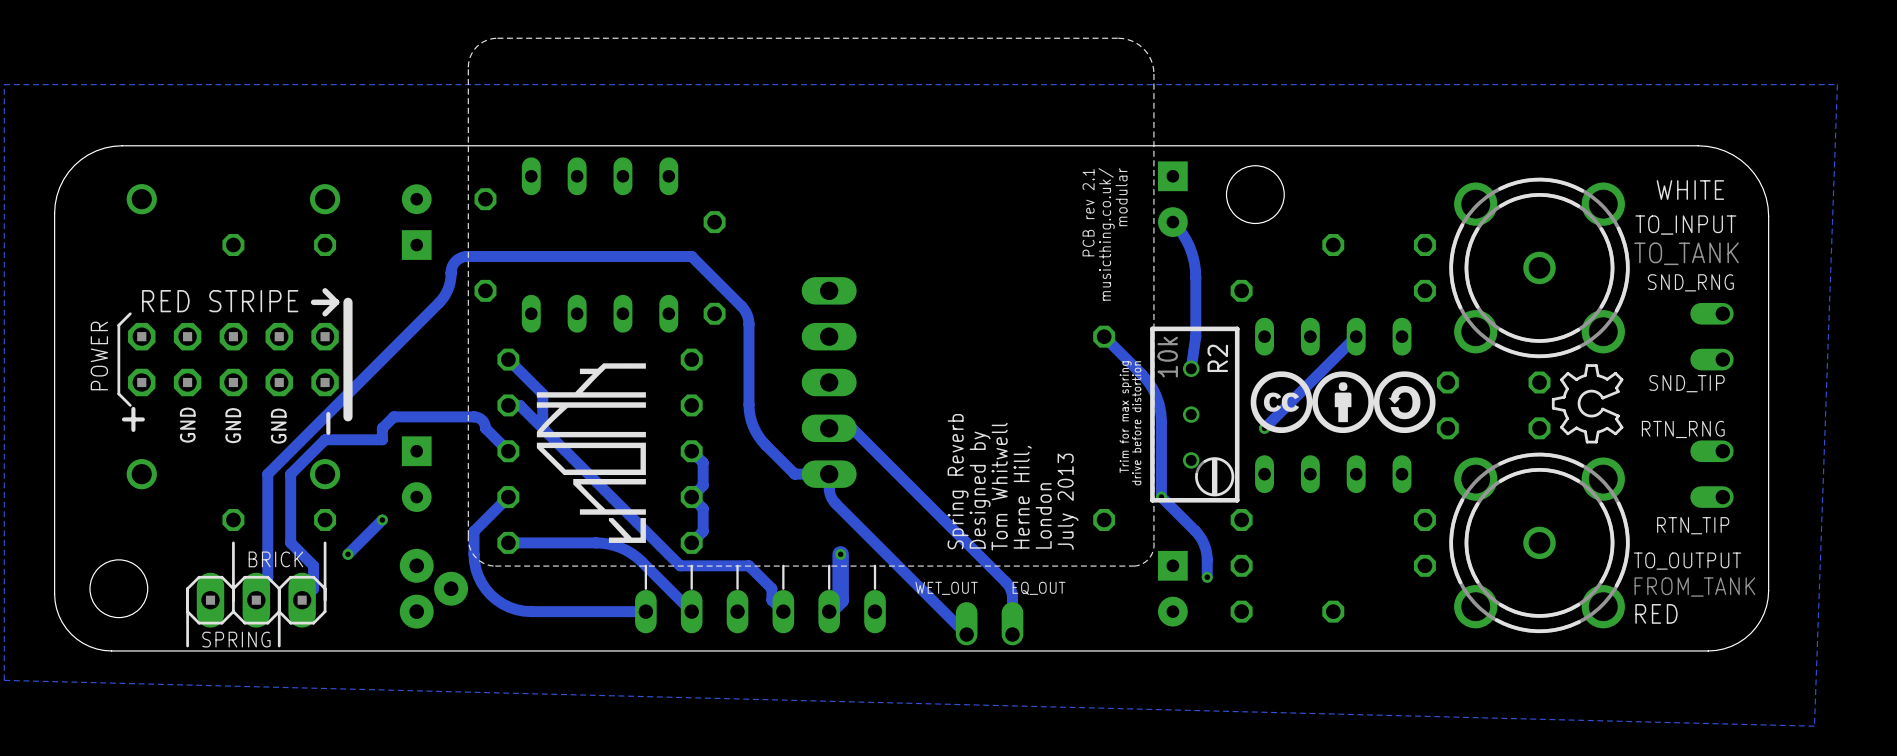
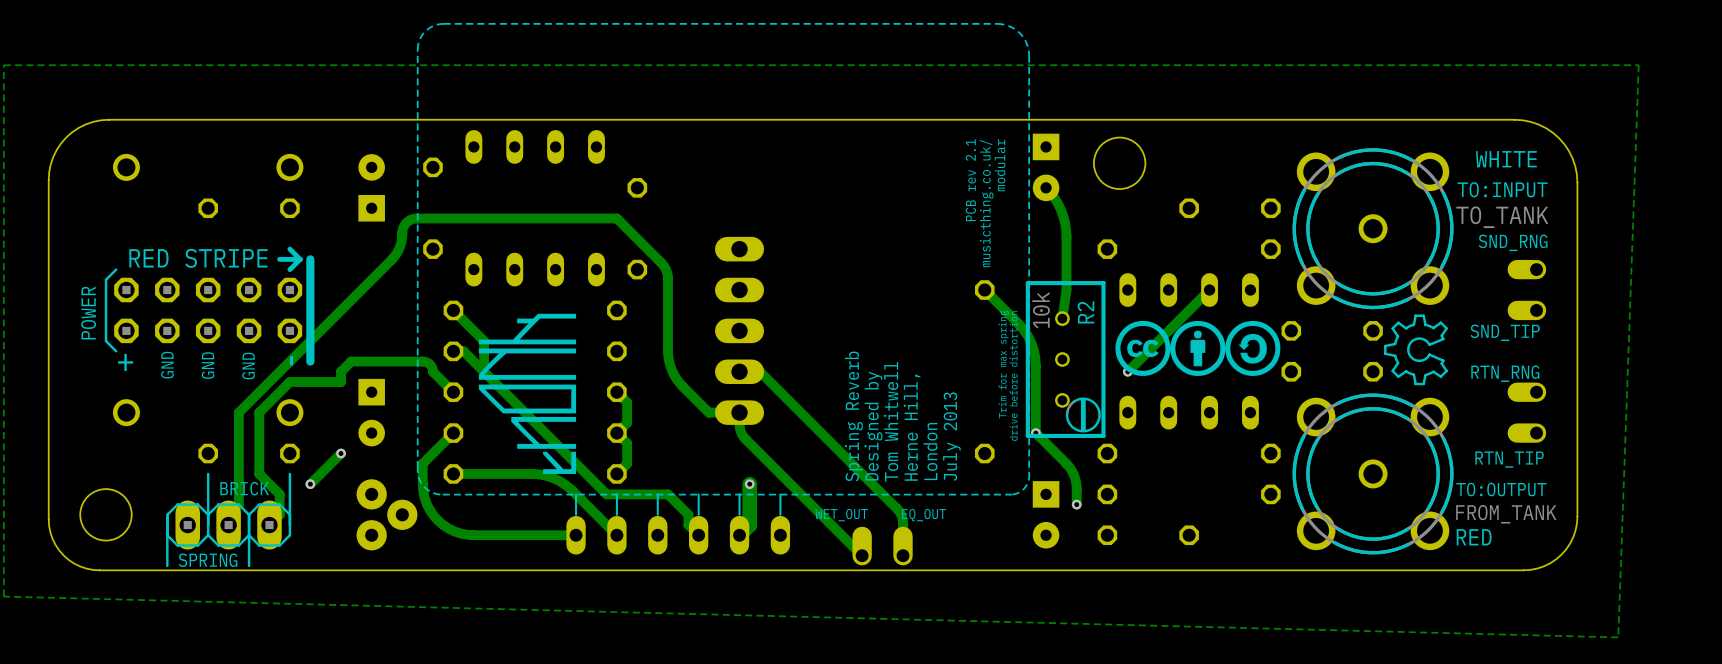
TO_INPUT name: TO_INPUT (1685, 225) -> TO:INPUT (1502, 189)
TO_OUTPUT name: TO_OUTPUT (1687, 561) -> TO:OUTPUT (1501, 489)

